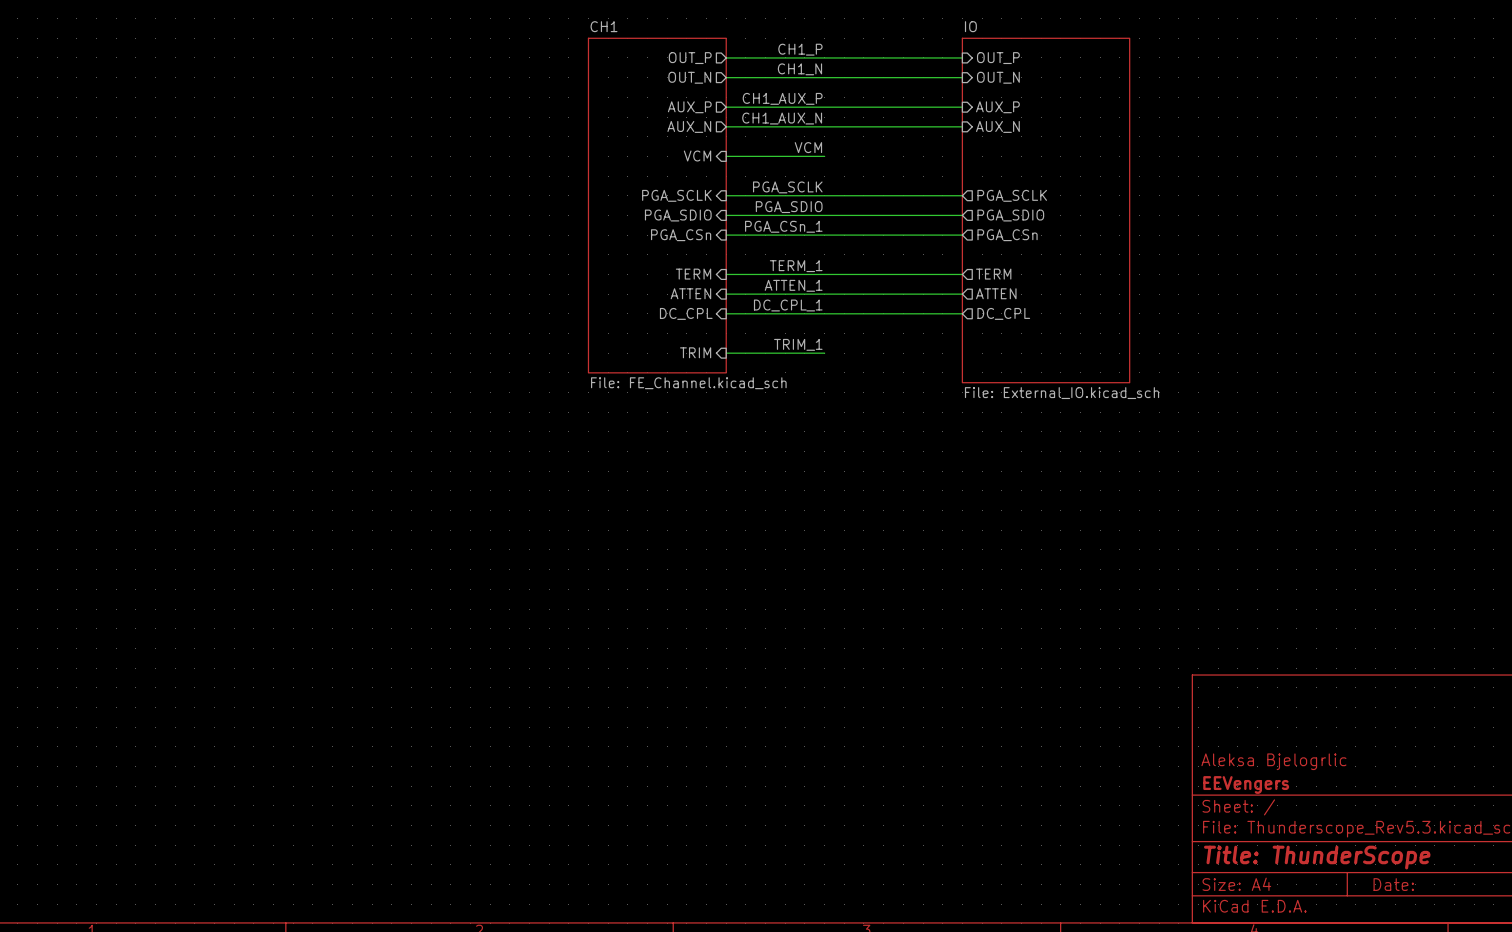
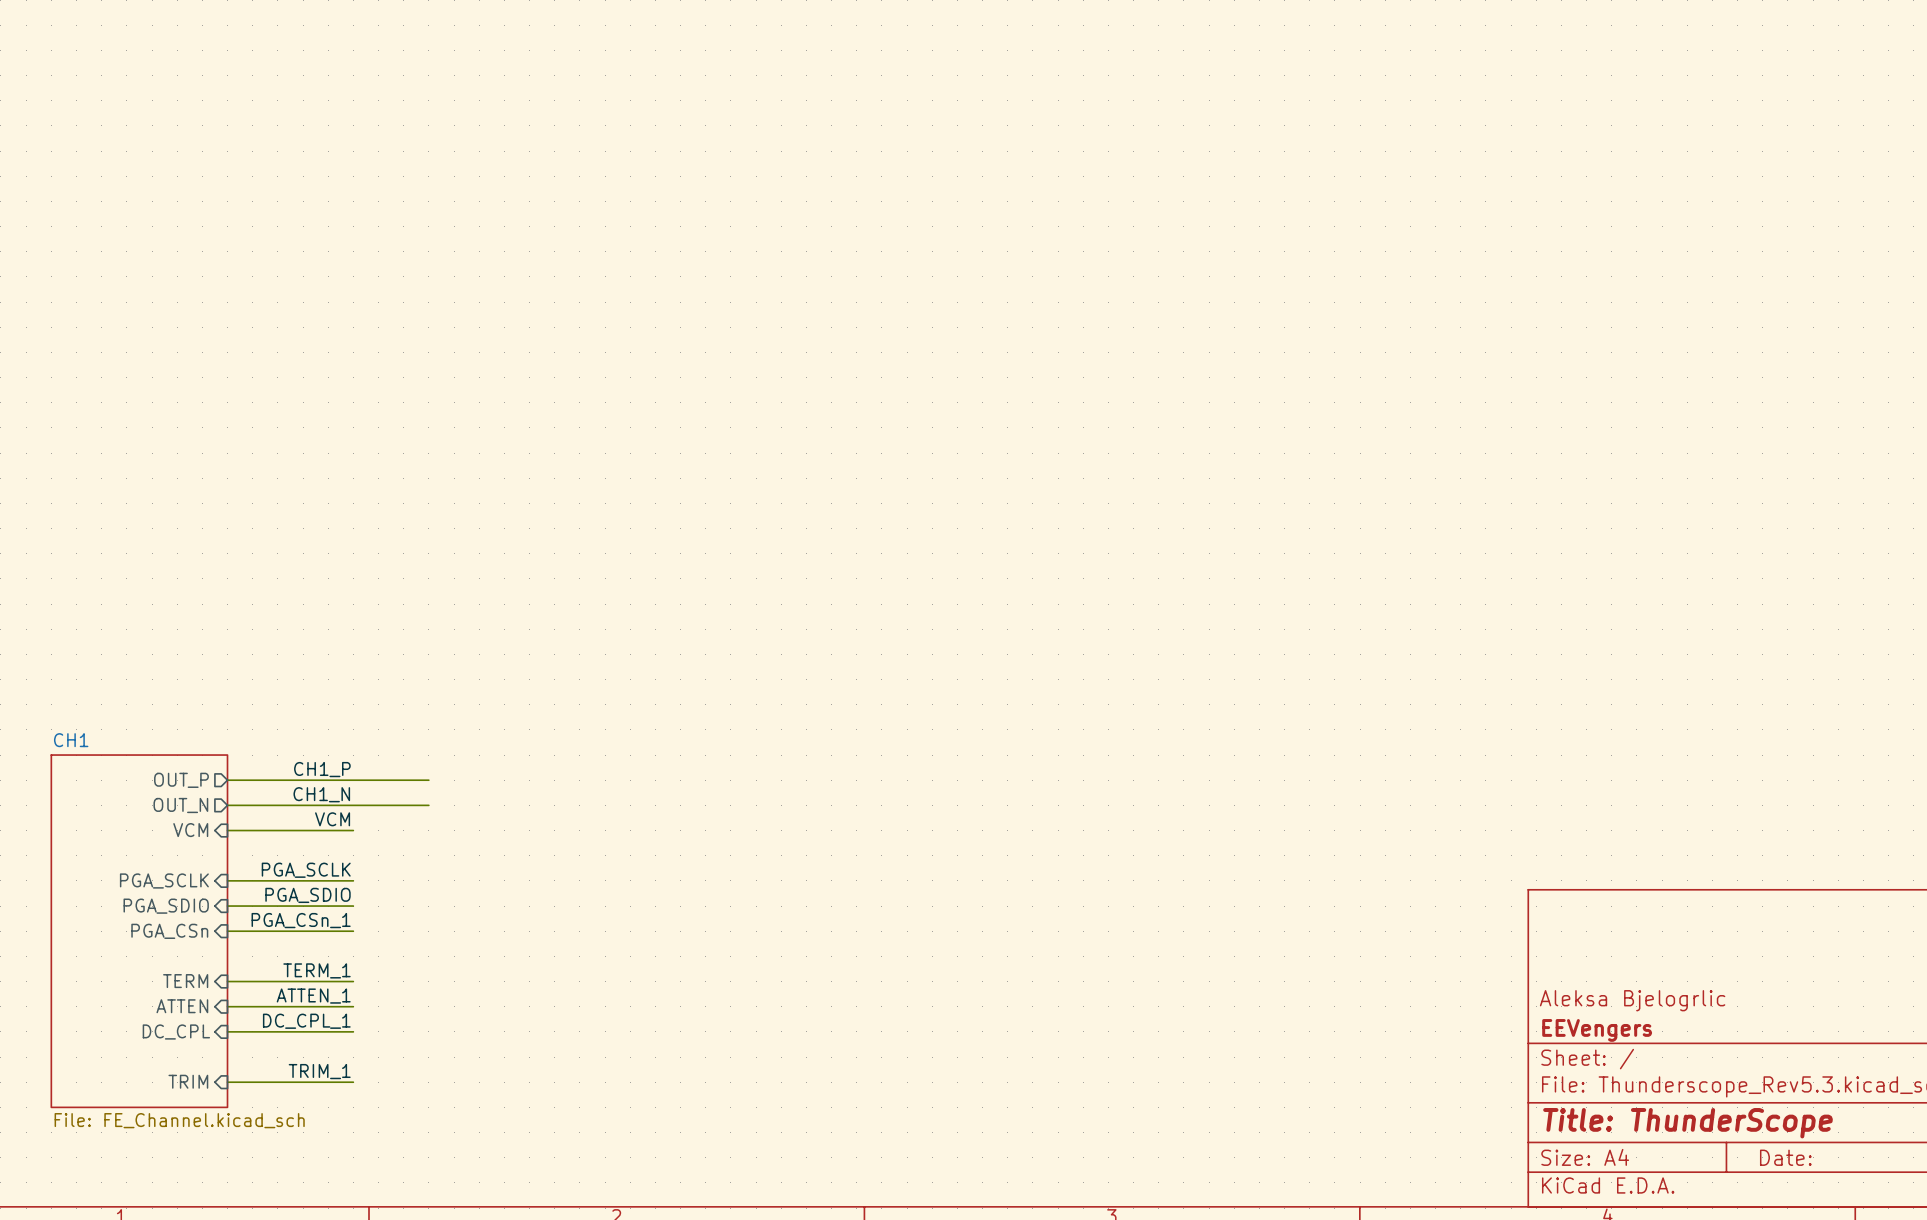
sheet CH1 name position: CH1 (604, 26) -> CH1 (71, 740)
sheet CH1 shape: [588, 38, 727, 373] -> [51, 755, 228, 1108]
label: CH1_P (800, 49) -> none
wire: (726, 57) (962, 57) -> none
sheet pin: OUT_P (690, 58) -> none
sheet pin: OUT_P (998, 58) -> none
label: CH1_N (799, 69) -> none
sheet pin: OUT_N (689, 77) -> none
wire: (726, 77) (962, 77) -> none
sheet pin: OUT_N (998, 77) -> none
label: CH1_AUX_P (782, 98) -> none
sheet pin: AUX_P (689, 107) -> none
wire: (726, 107) (962, 107) -> none
sheet pin: AUX_P (997, 107) -> none
label: CH1_AUX_N (782, 118) -> none
sheet pin: AUX_N (689, 126) -> none
wire: (726, 126) (962, 126) -> none
sheet pin: AUX_N (997, 126) -> none
label: VCM (808, 147) -> none
sheet pin: VCM (697, 156) -> none
wire: (726, 156) (824, 156) -> none
label: PGA_SCLK (787, 187) -> none
sheet pin: PGA_SCLK (676, 195) -> none
wire: (726, 195) (962, 195) -> none
sheet pin: PGA_SCLK (1012, 195) -> none
label: PGA_SDIO (789, 207) -> none
sheet IO: File: External_IO.kicad_sch (1046, 210) -> none
sheet pin: PGA_SDIO (678, 215) -> none
wire: (726, 215) (962, 215) -> none
sheet pin: PGA_SDIO (1010, 215) -> none
label: PGA_CSn_1 (783, 226) -> none
sheet pin: PGA_CSn (681, 235) -> none
wire: (726, 235) (962, 235) -> none
sheet pin: PGA_CSn (1007, 235) -> none
label: TERM_1 (796, 266) -> none
sheet pin: TERM (693, 274) -> none
wire: (726, 274) (962, 274) -> none
sheet pin: TERM (993, 274) -> none
label: ATTEN_1 (793, 285) -> none
sheet pin: ATTEN (690, 293) -> none
sheet pin: ATTEN (996, 293) -> none
wire: (726, 294) (962, 294) -> none
label: DC_CPL_1 (788, 305) -> none
sheet pin: DC_CPL (686, 313) -> none
wire: (726, 313) (962, 313) -> none
sheet pin: DC_CPL (1003, 313) -> none
label: TRIM_1 (798, 344) -> none
sheet pin: TRIM (695, 352) -> none
wire: (726, 353) (824, 353) -> none
sheet CH1 value position: File: FE_Channel.kicad_sch (688, 383) -> File: FE_Channel.kicad_sch (179, 1120)
label: none -> CH1_P (322, 769)
sheet pin: none -> OUT_P (181, 780)
wire: none -> (227, 780) (428, 780)
label: none -> CH1_N (321, 794)
sheet pin: none -> OUT_N (180, 805)
wire: none -> (227, 805) (428, 805)
label: none -> VCM (332, 819)
sheet pin: none -> VCM (190, 830)
wire: none -> (227, 830) (353, 830)
label: none -> PGA_SCLK (306, 870)
sheet pin: none -> PGA_SCLK (164, 881)
wire: none -> (227, 880) (353, 880)
label: none -> PGA_SDIO (308, 895)
sheet pin: none -> PGA_SDIO (166, 906)
wire: none -> (227, 906) (353, 906)
label: none -> PGA_CSn_1 (301, 920)
sheet pin: none -> PGA_CSn (169, 931)
wire: none -> (227, 931) (353, 931)
label: none -> TERM_1 (316, 970)
sheet pin: none -> TERM (185, 981)
wire: none -> (227, 981) (353, 981)
label: none -> ATTEN_1 (313, 996)
sheet pin: none -> ATTEN (182, 1006)
wire: none -> (227, 1006) (353, 1006)
label: none -> DC_CPL_1 (306, 1021)
sheet pin: none -> DC_CPL (176, 1032)
wire: none -> (227, 1031) (353, 1031)
label: none -> TRIM_1 (319, 1071)
sheet pin: none -> TRIM (188, 1081)
wire: none -> (227, 1082) (353, 1082)

